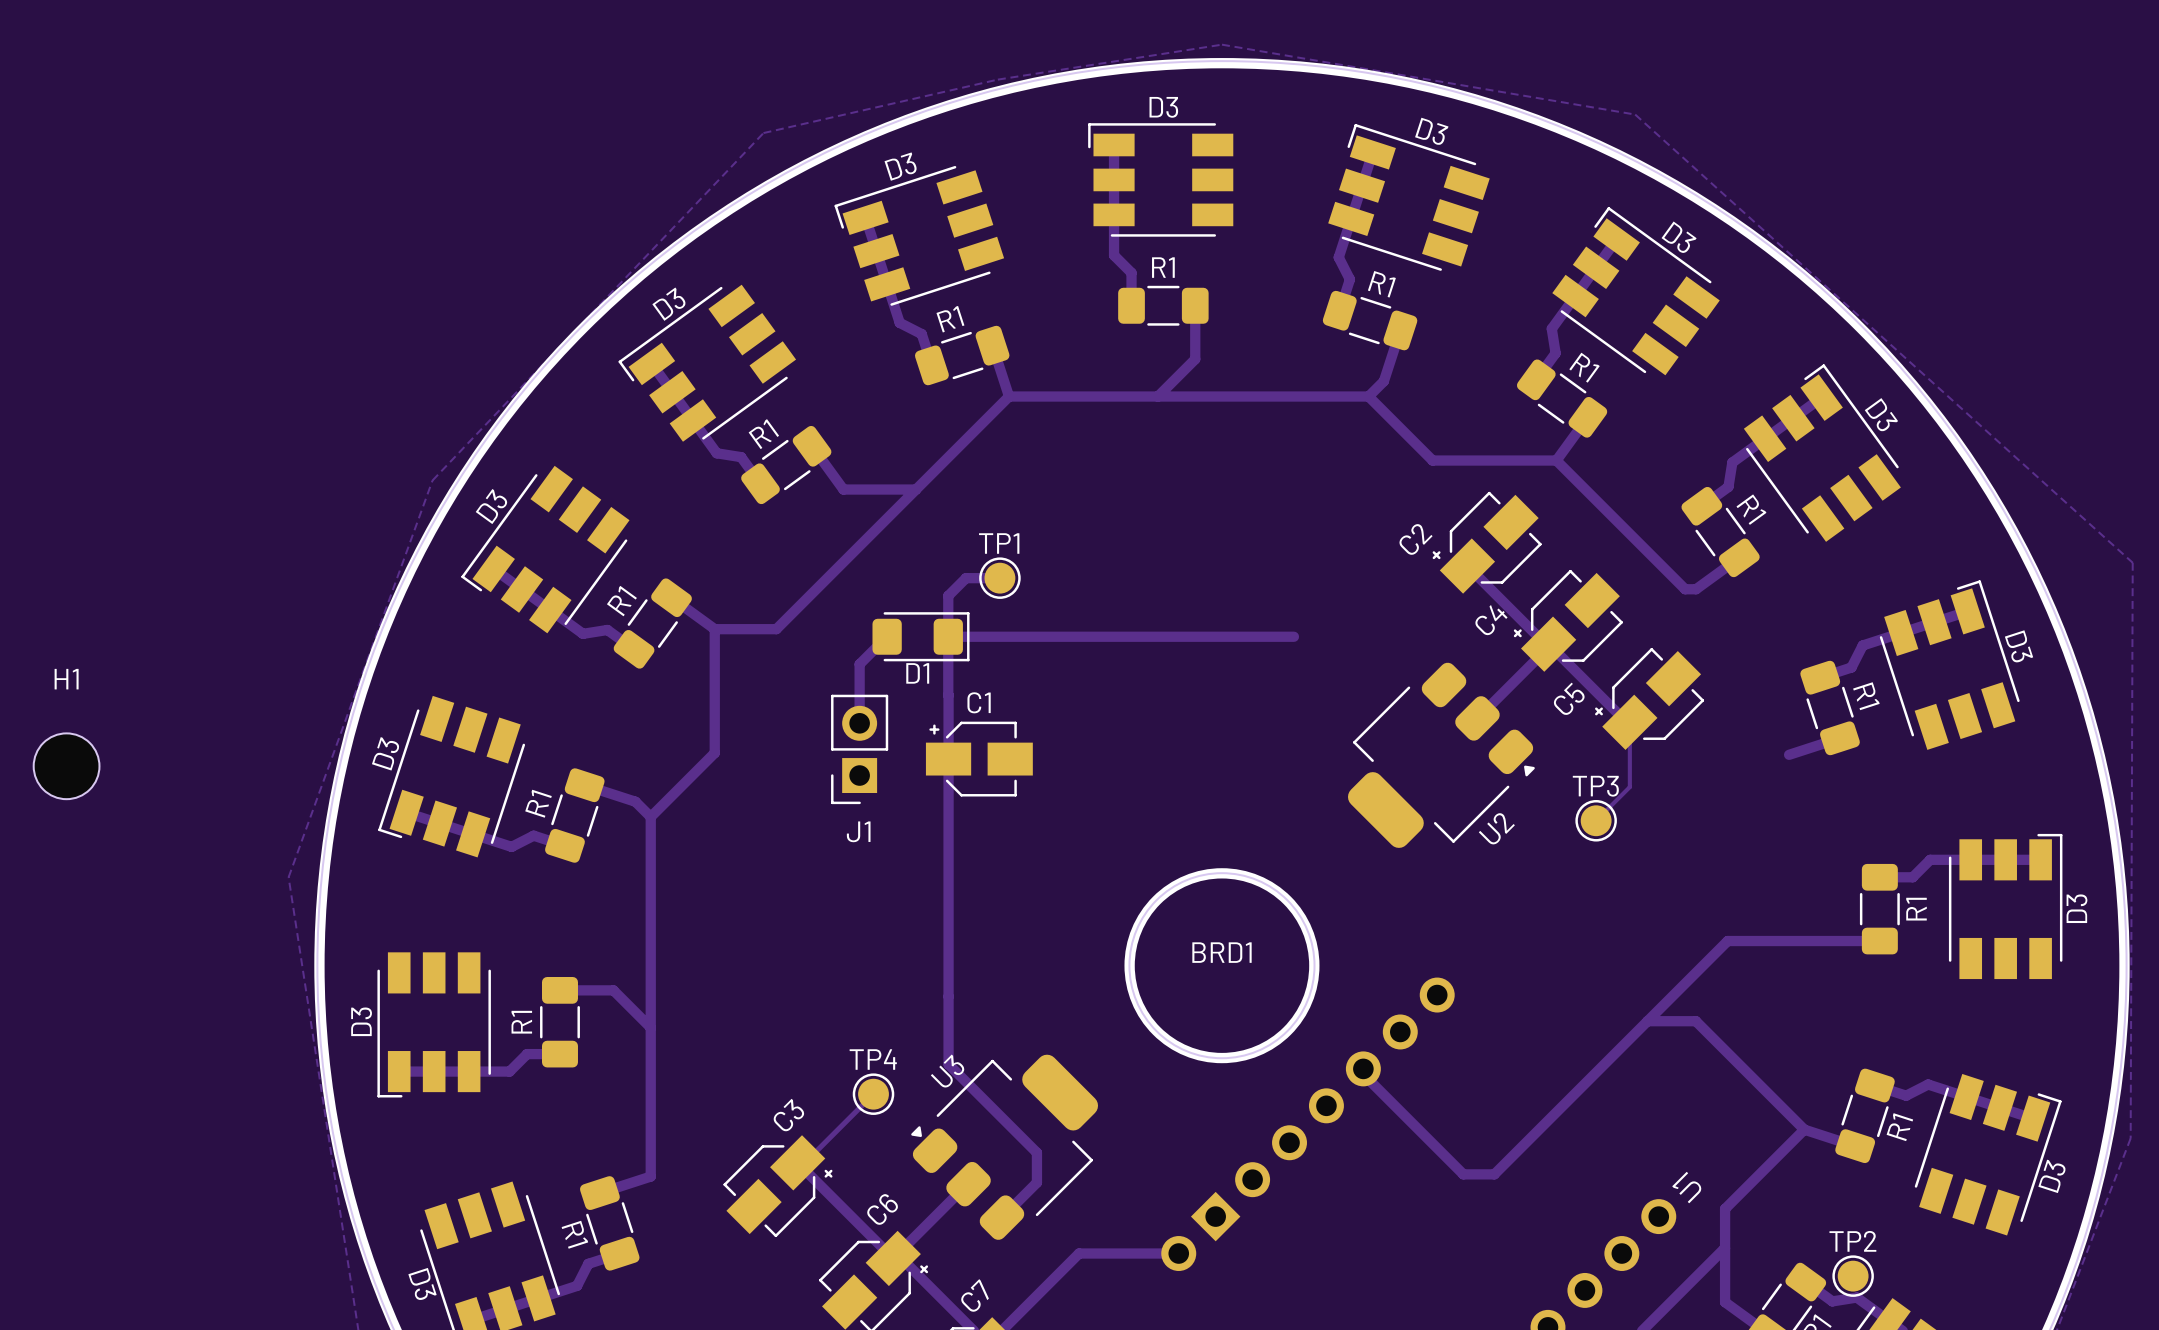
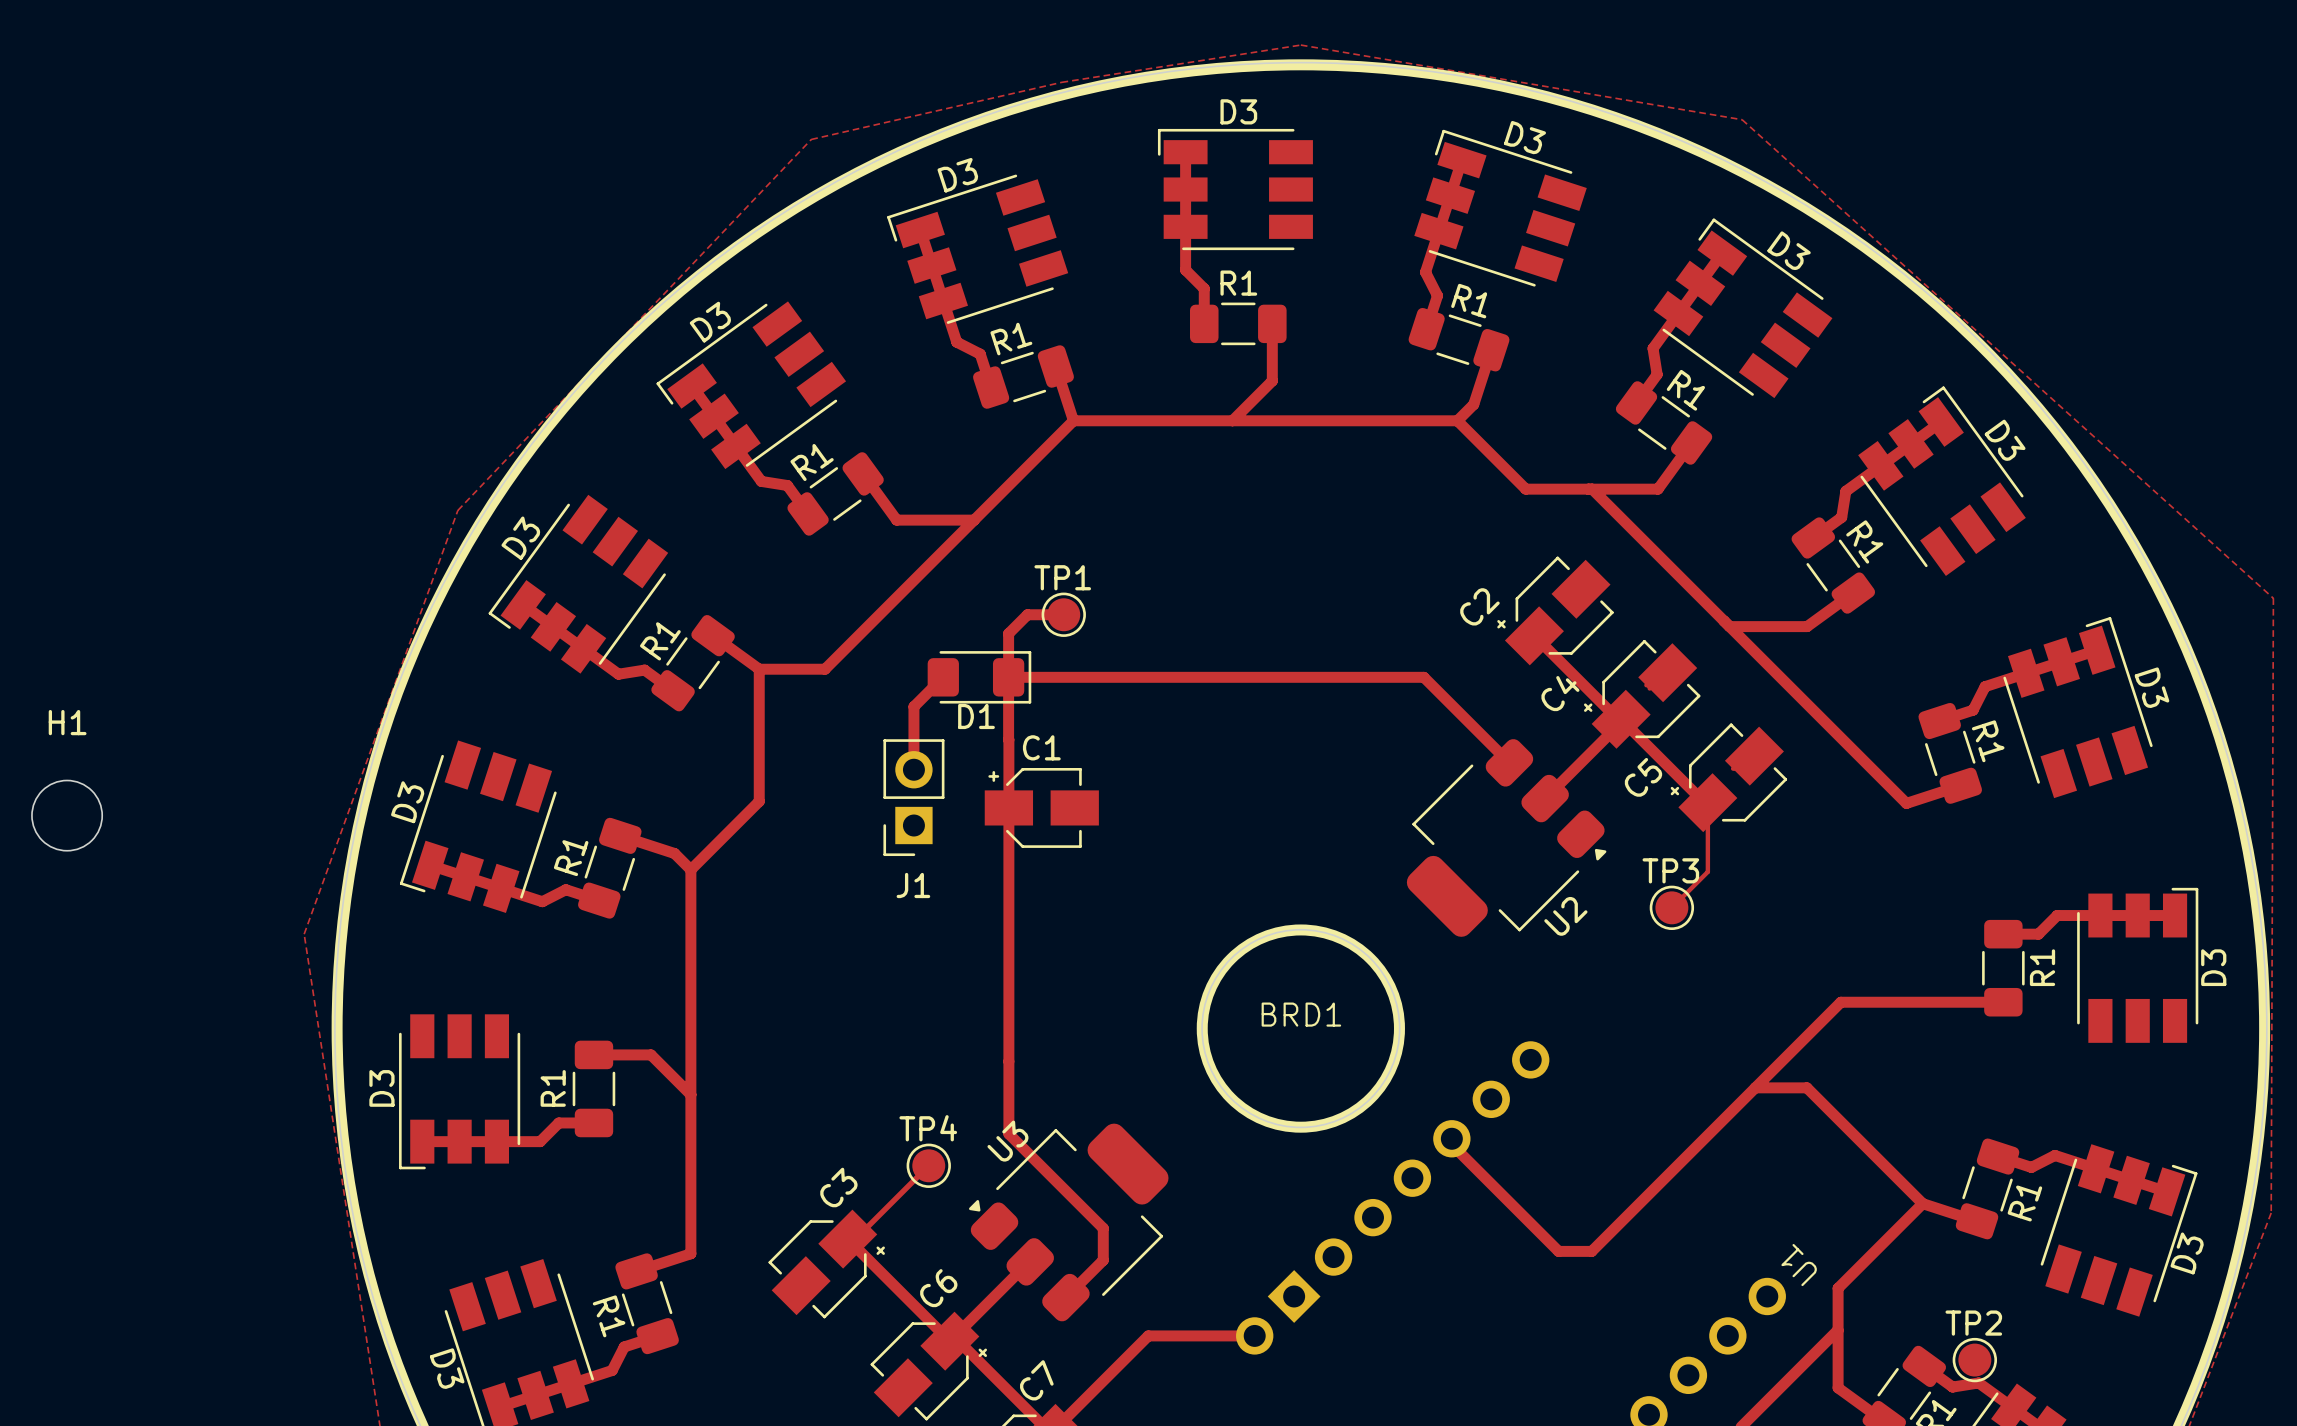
track: none -> (1592, 489) (1906, 803)
track: (1556, 460) (1685, 589) -> (1729, 626) (1795, 626)
C2 position: (1487, 542) -> (1555, 610)
track: (1467, 566) (1545, 644) -> (1534, 635) (1617, 719)
C4 position: (1568, 620) -> (1642, 694)
track: none -> (1377, 677) (1423, 677) (1509, 762)
track: (1548, 644) (1626, 722) -> (1621, 719) (1704, 802)
track: (1548, 647) (1477, 718) -> (1621, 722) (1545, 798)
C5 position: (1649, 699) -> (1728, 777)
track: (1629, 722) (1629, 787) (1596, 820) -> (1707, 802) (1707, 871) (1671, 907)
U2 position: (1441, 755) -> (1506, 837)
TP3 position: (1596, 820) -> (1671, 907)

